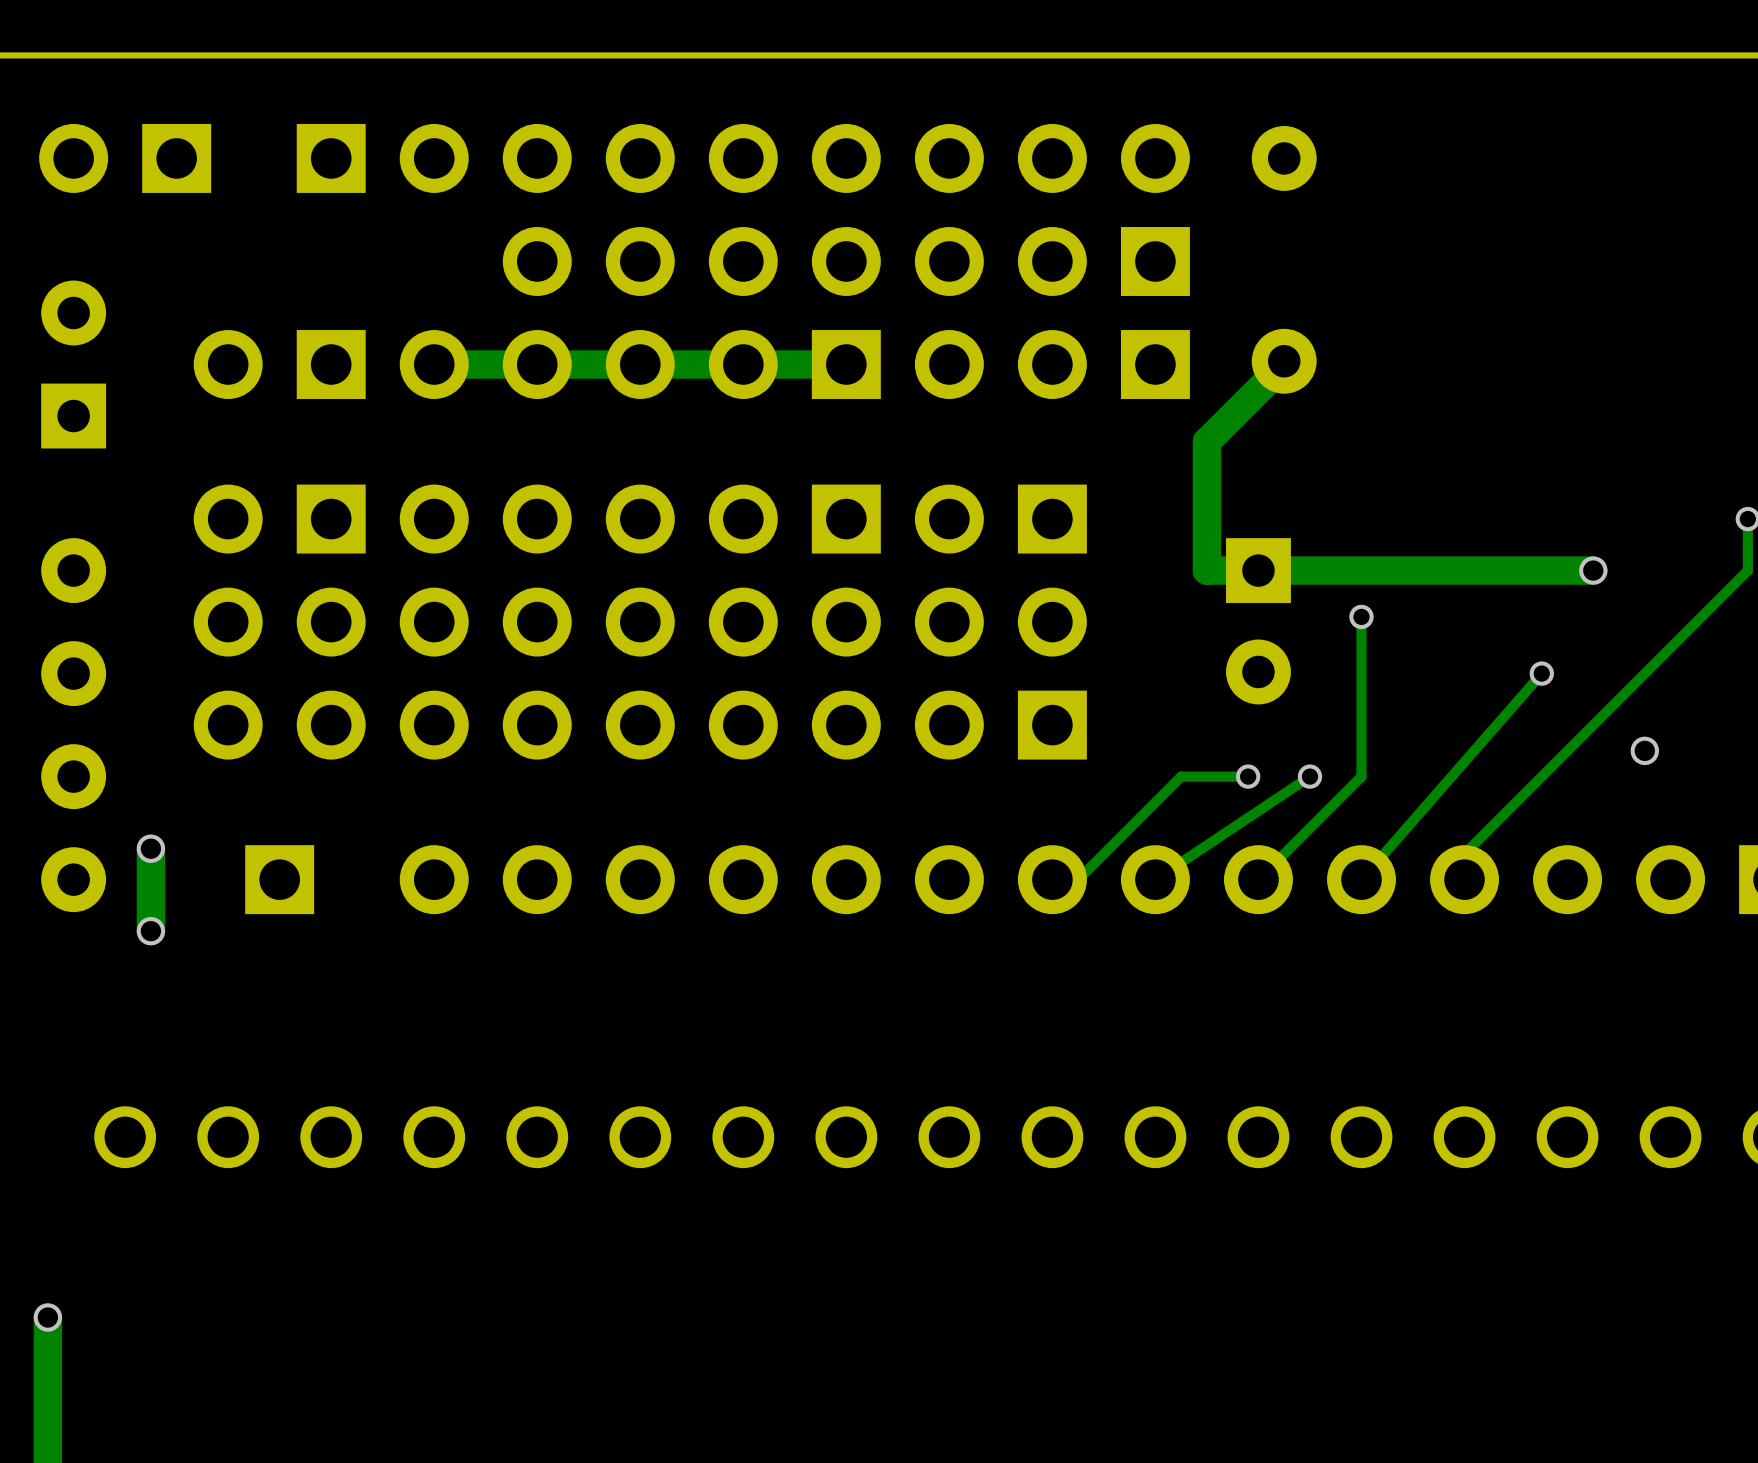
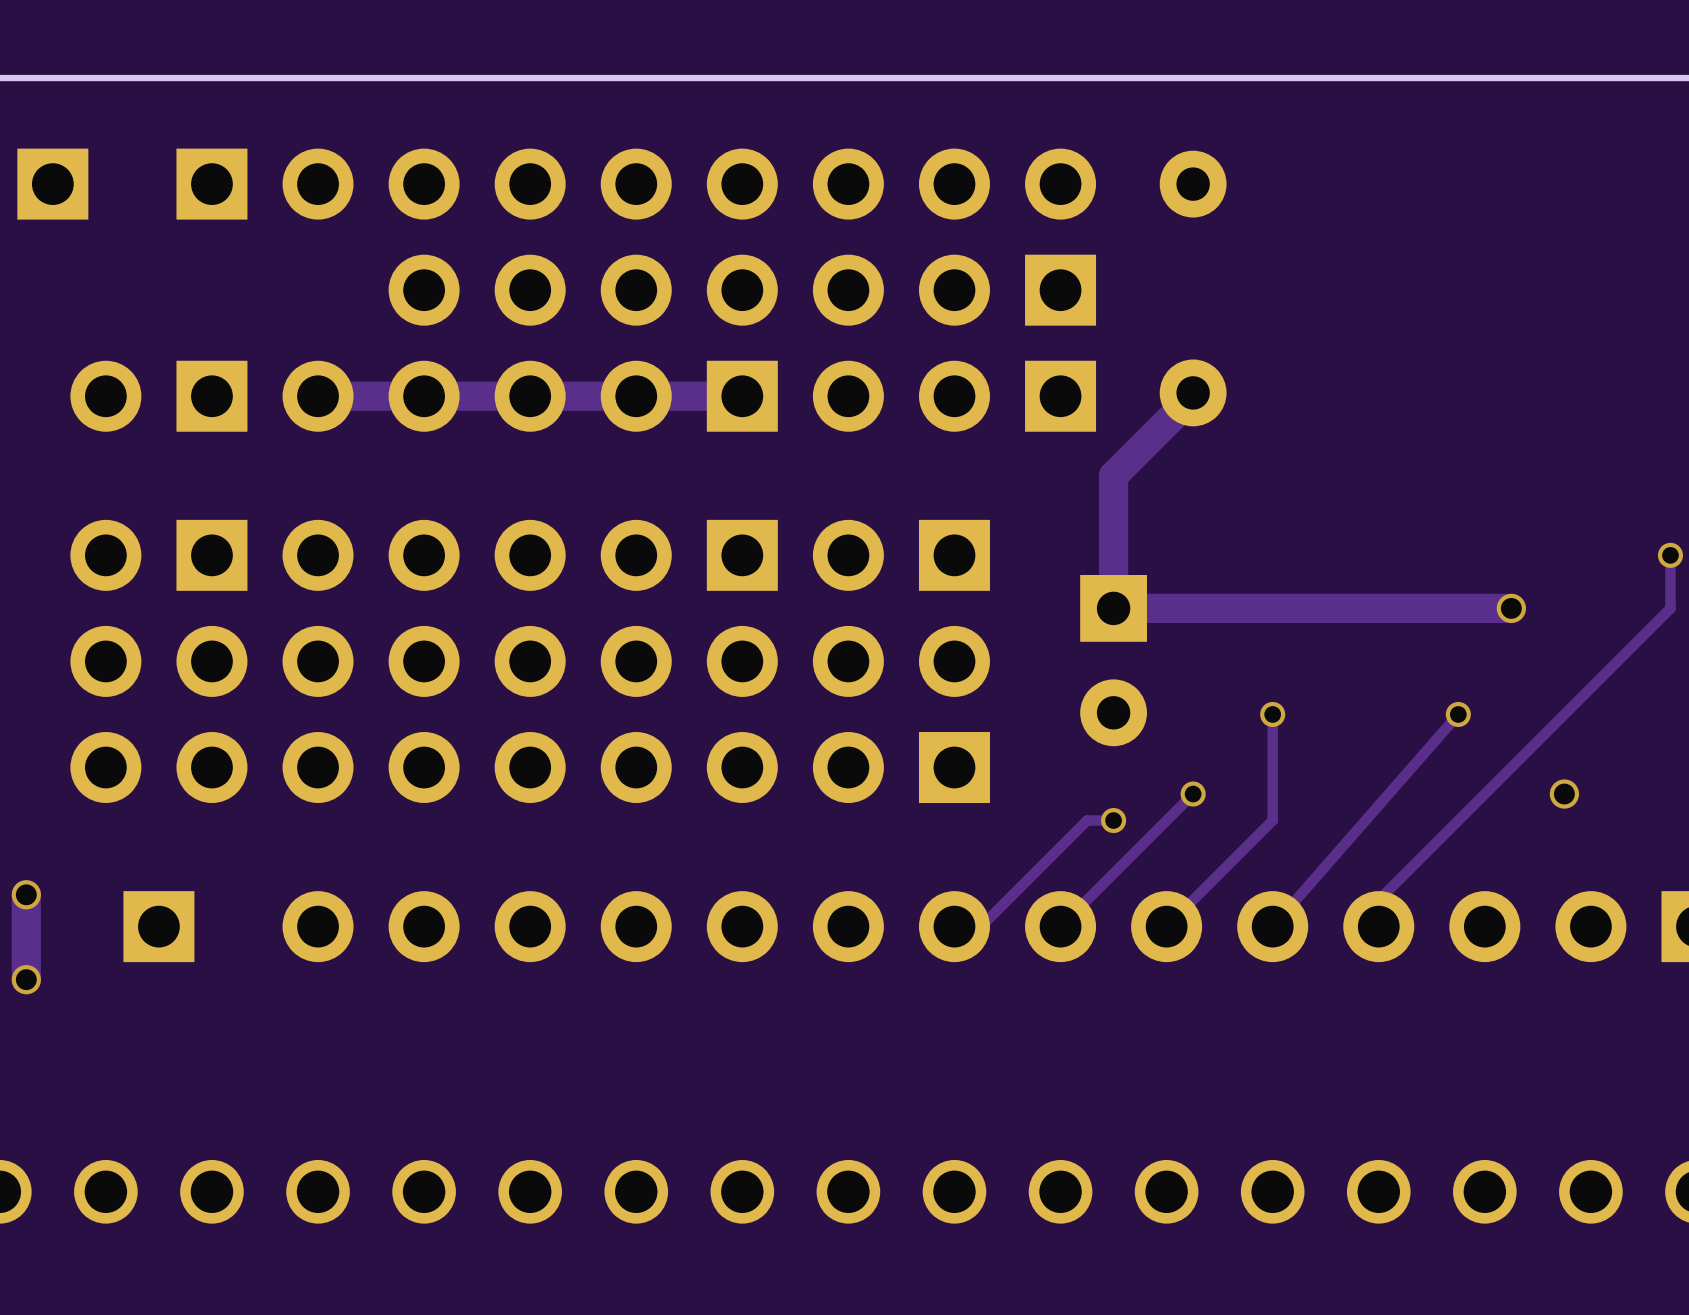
track: (1361, 616) (1361, 673) -> none
via position: (1361, 616) -> (1272, 714)
part position: (1258, 621) -> (1113, 660)
via: none -> (1193, 794)
via: none -> (1113, 820)
track: (1248, 776) (1206, 776) -> none
via: (1248, 776) -> none
track: (1309, 776) (1155, 879) -> (1193, 794) (1060, 926)
via: (1309, 776) -> none

